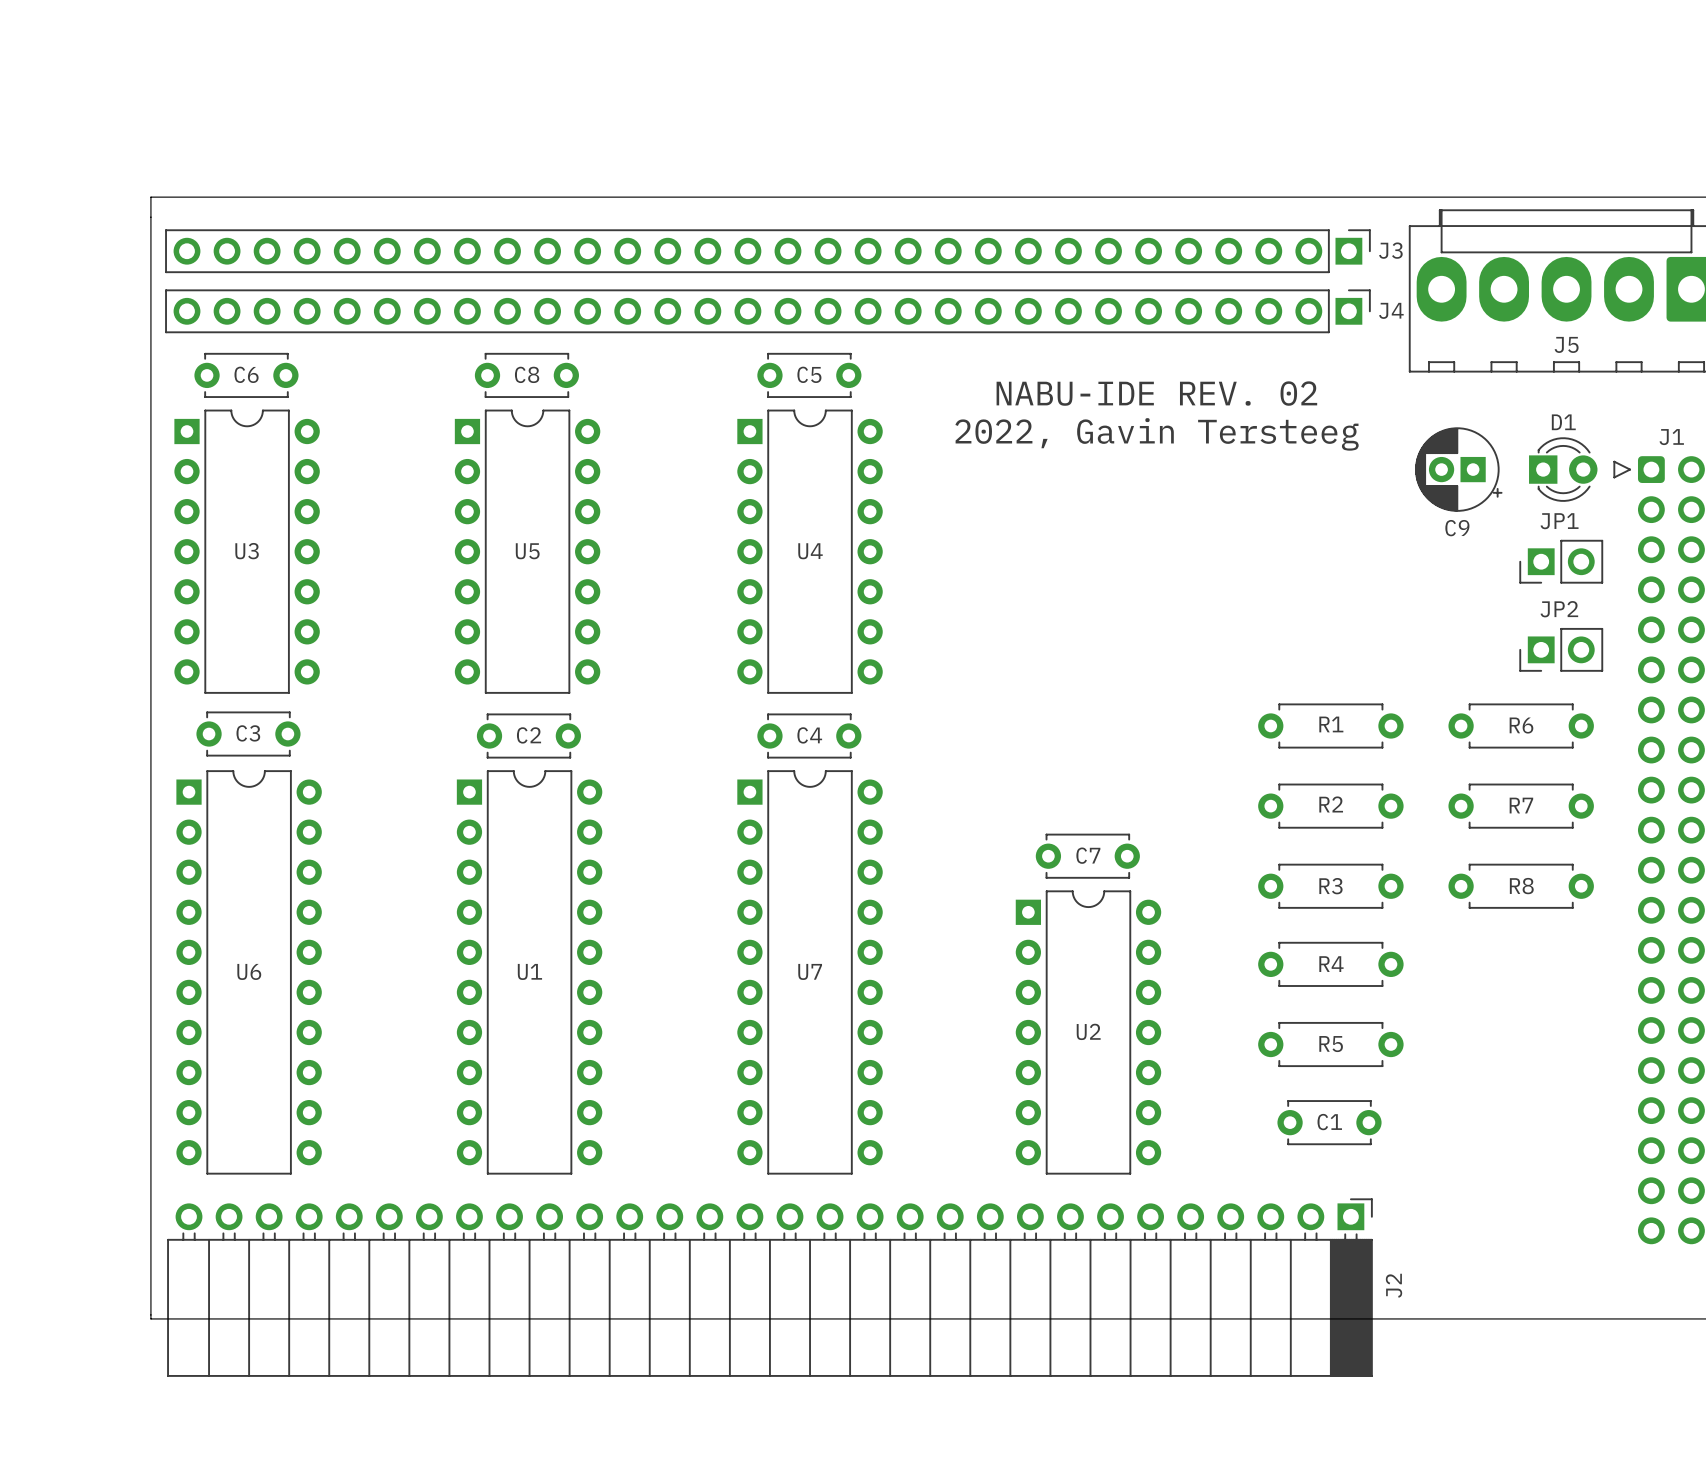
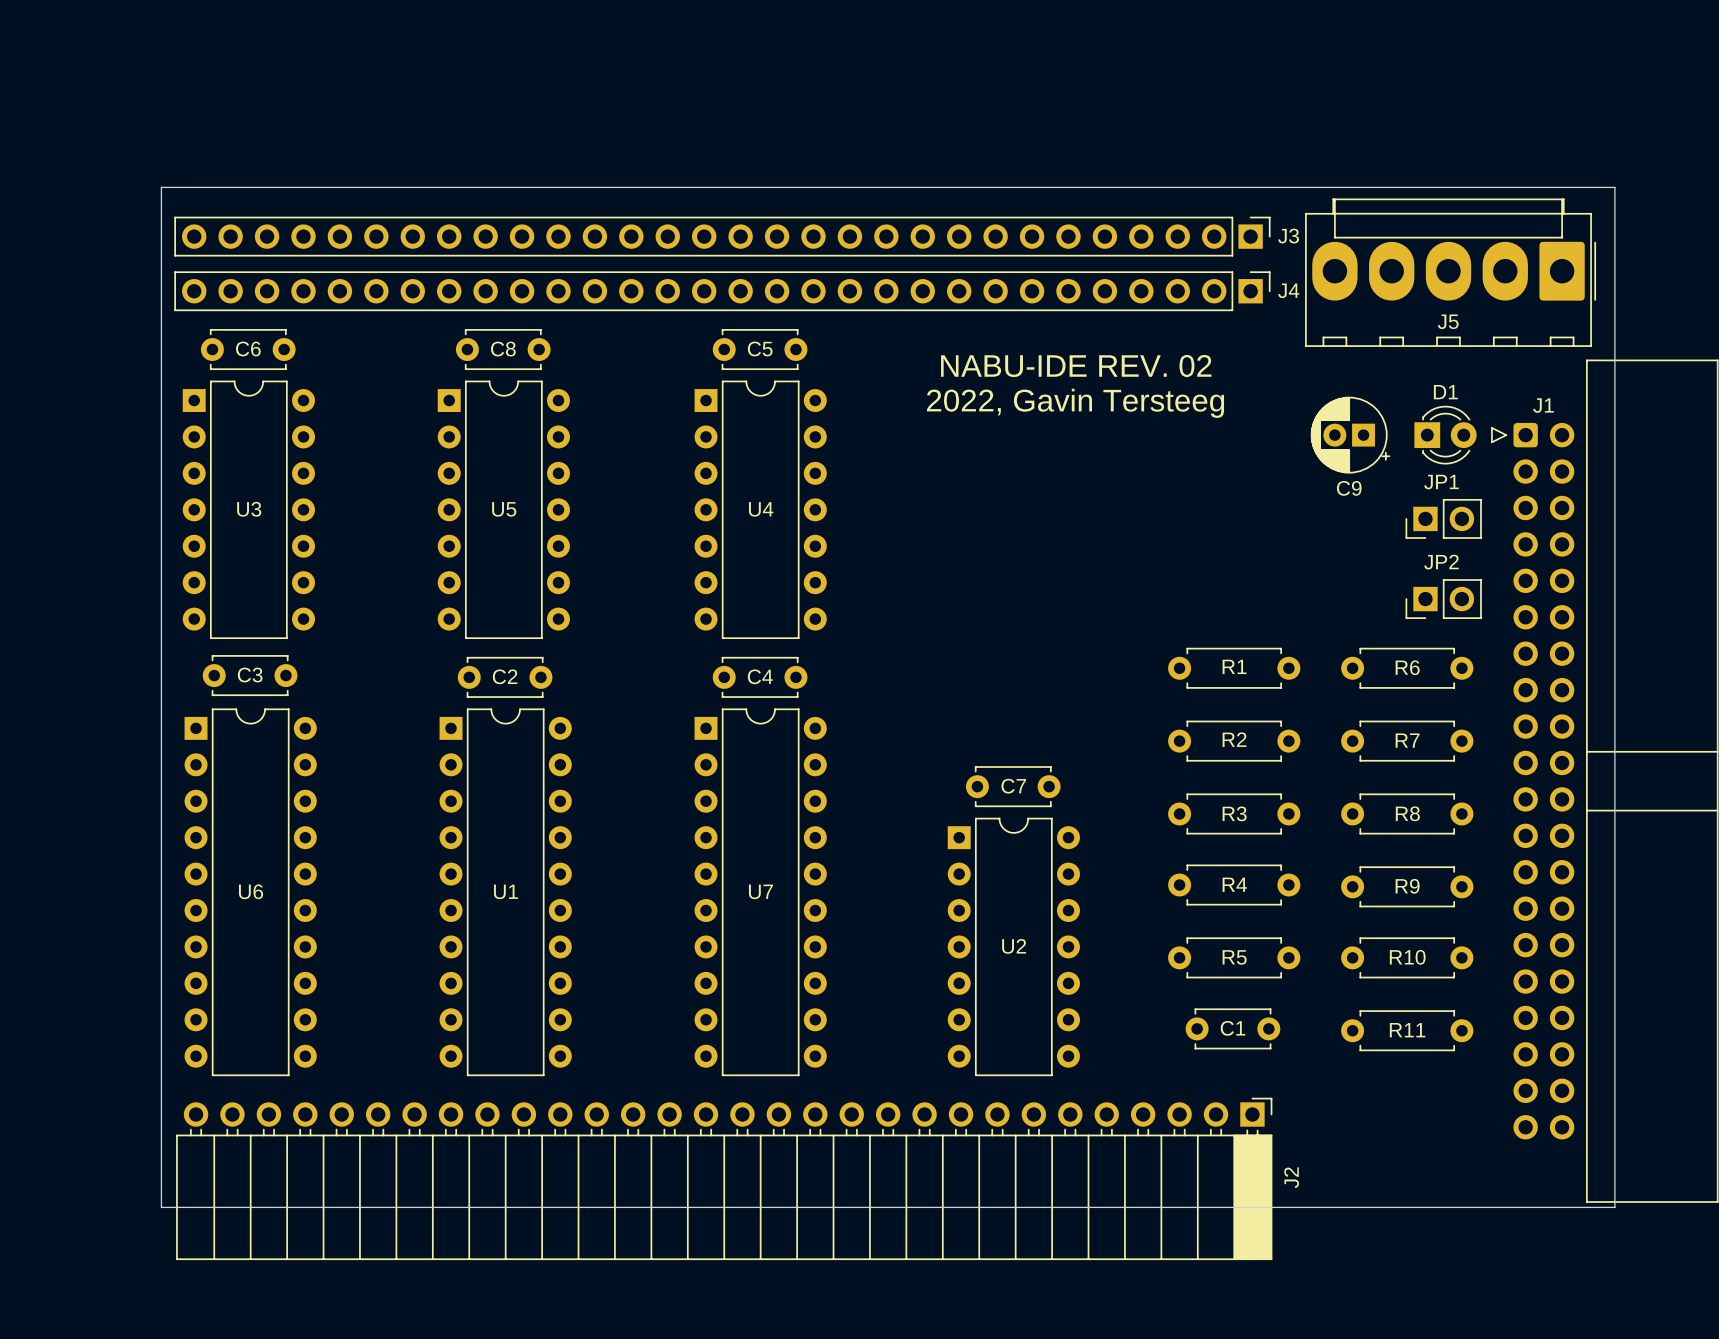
R9: none -> (1407, 886)
R10: none -> (1407, 957)
R11: none -> (1407, 1030)

